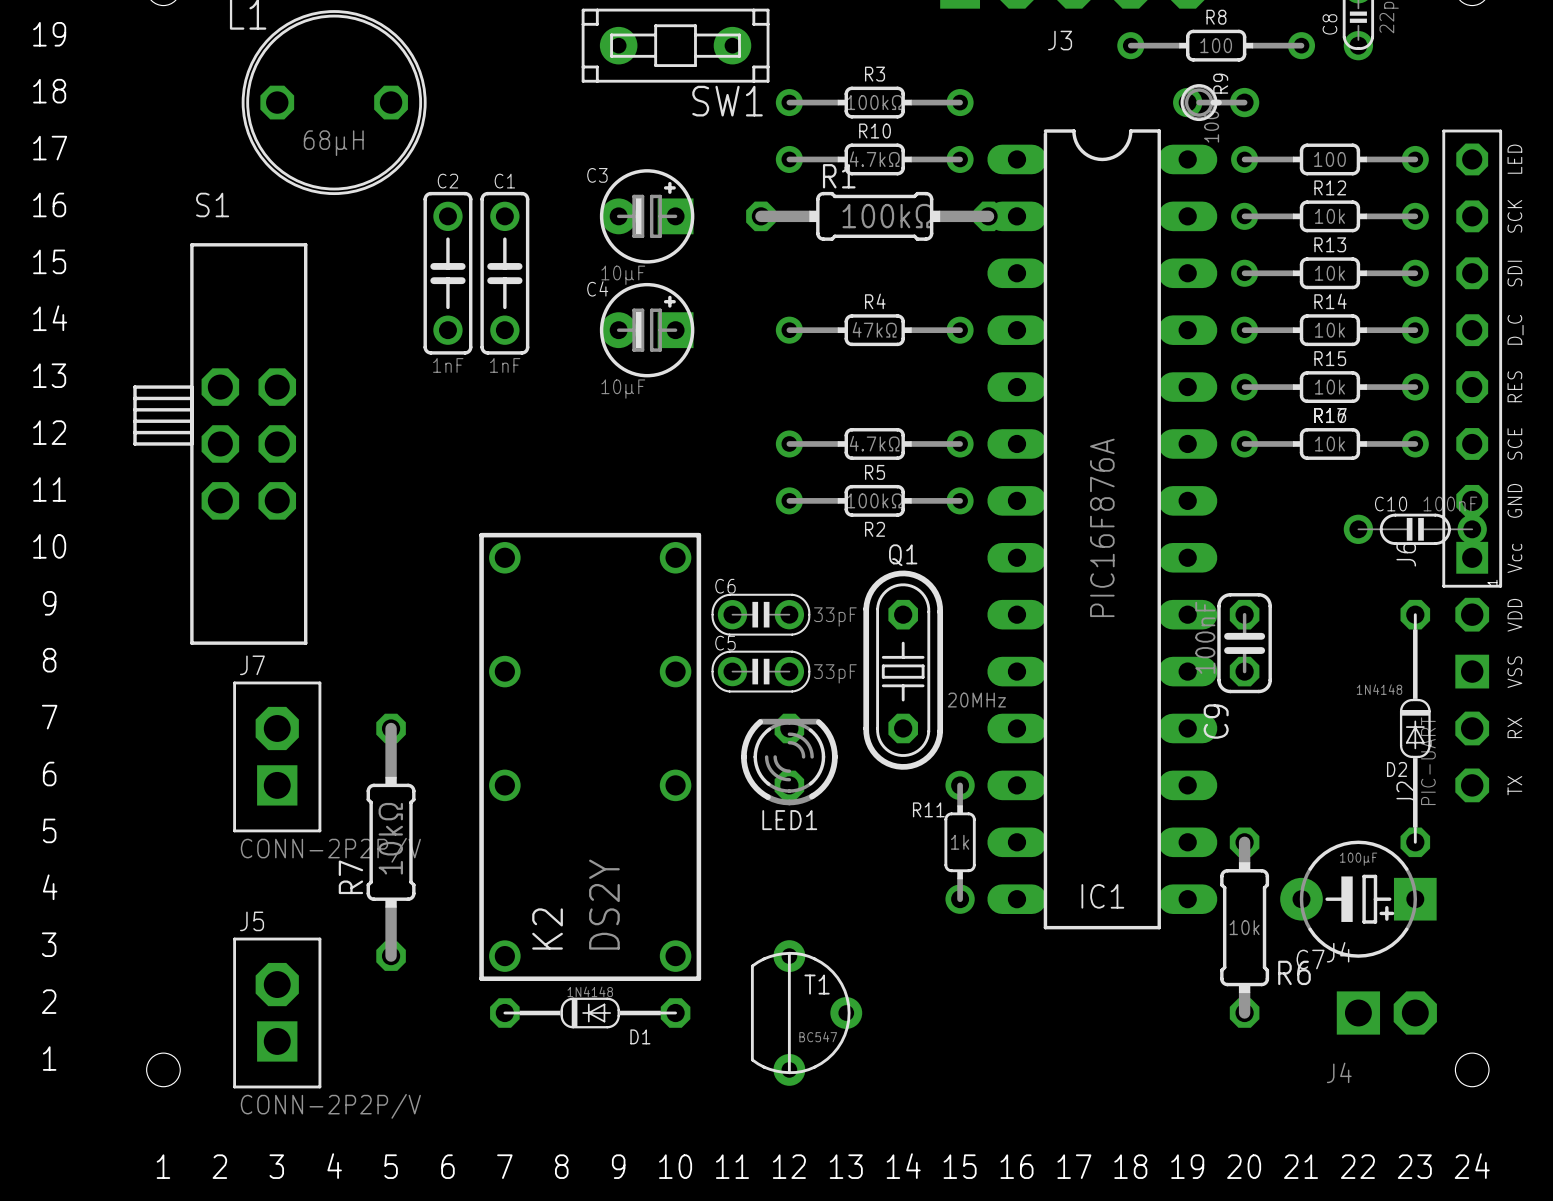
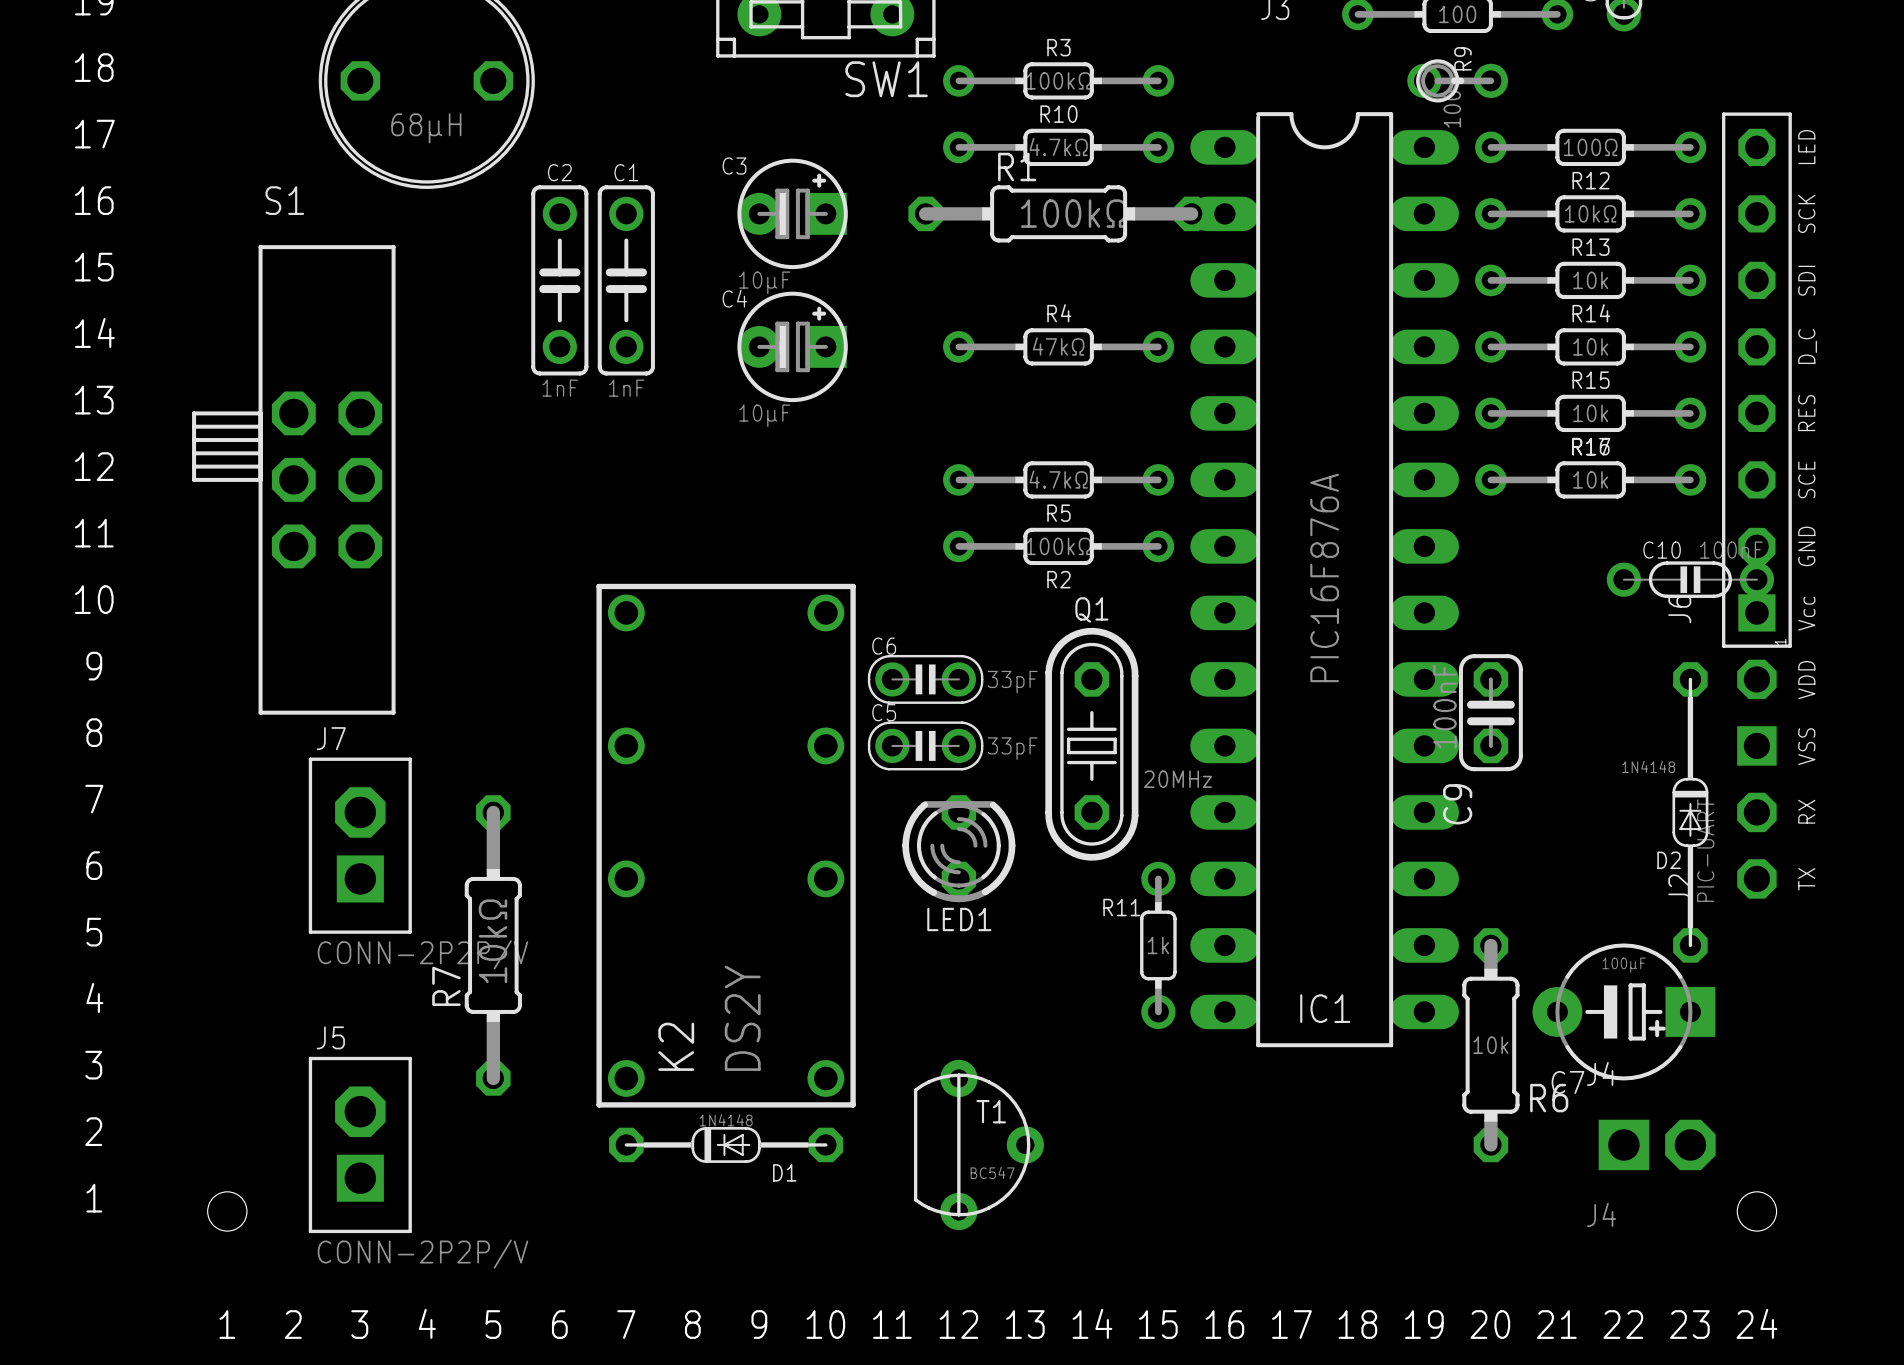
R12 value: 100 (1329, 159) -> 100Ω (1590, 147)
R13 value: 10k (1329, 216) -> 10kΩ (1590, 213)

